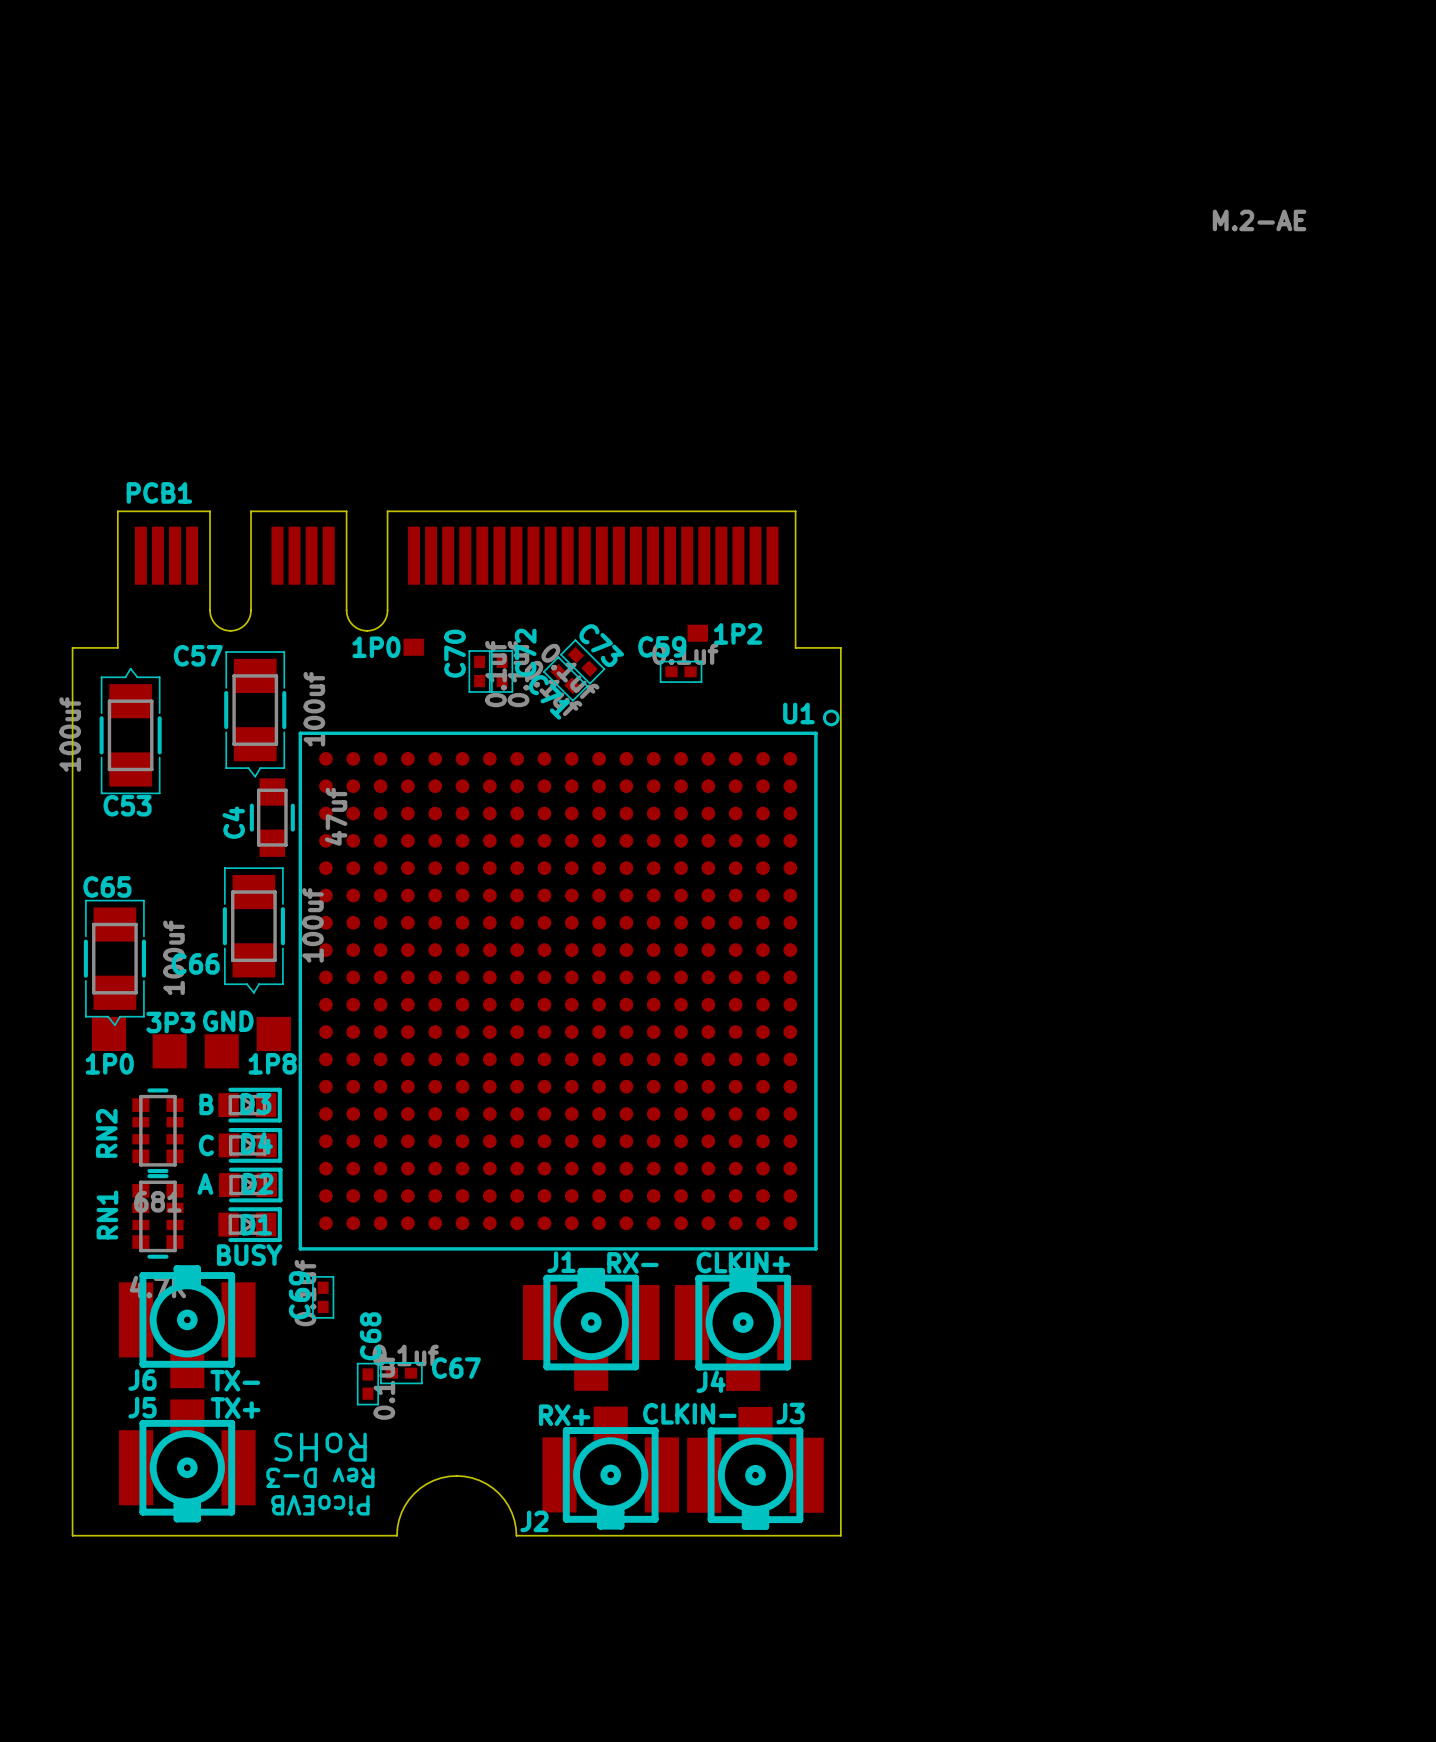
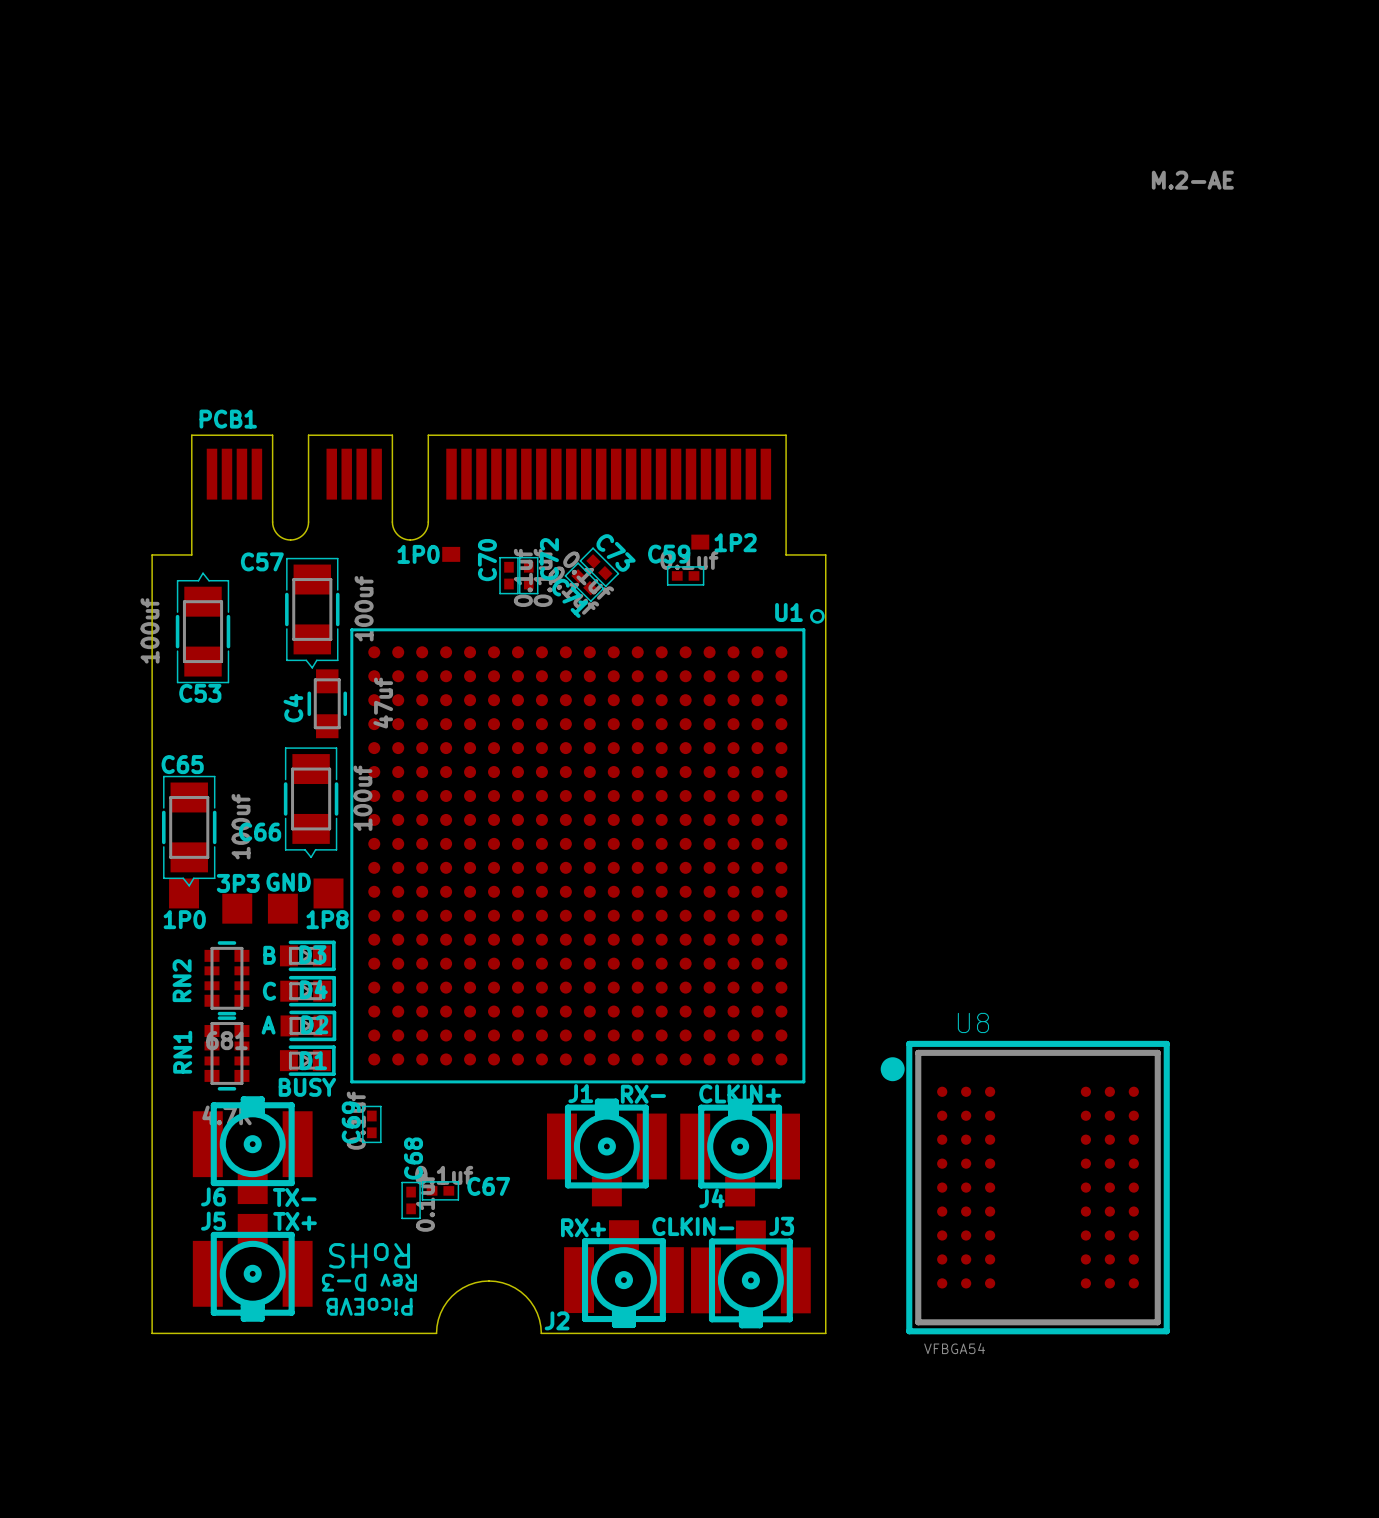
U8: none -> VFBGA54 (1025, 1187)

